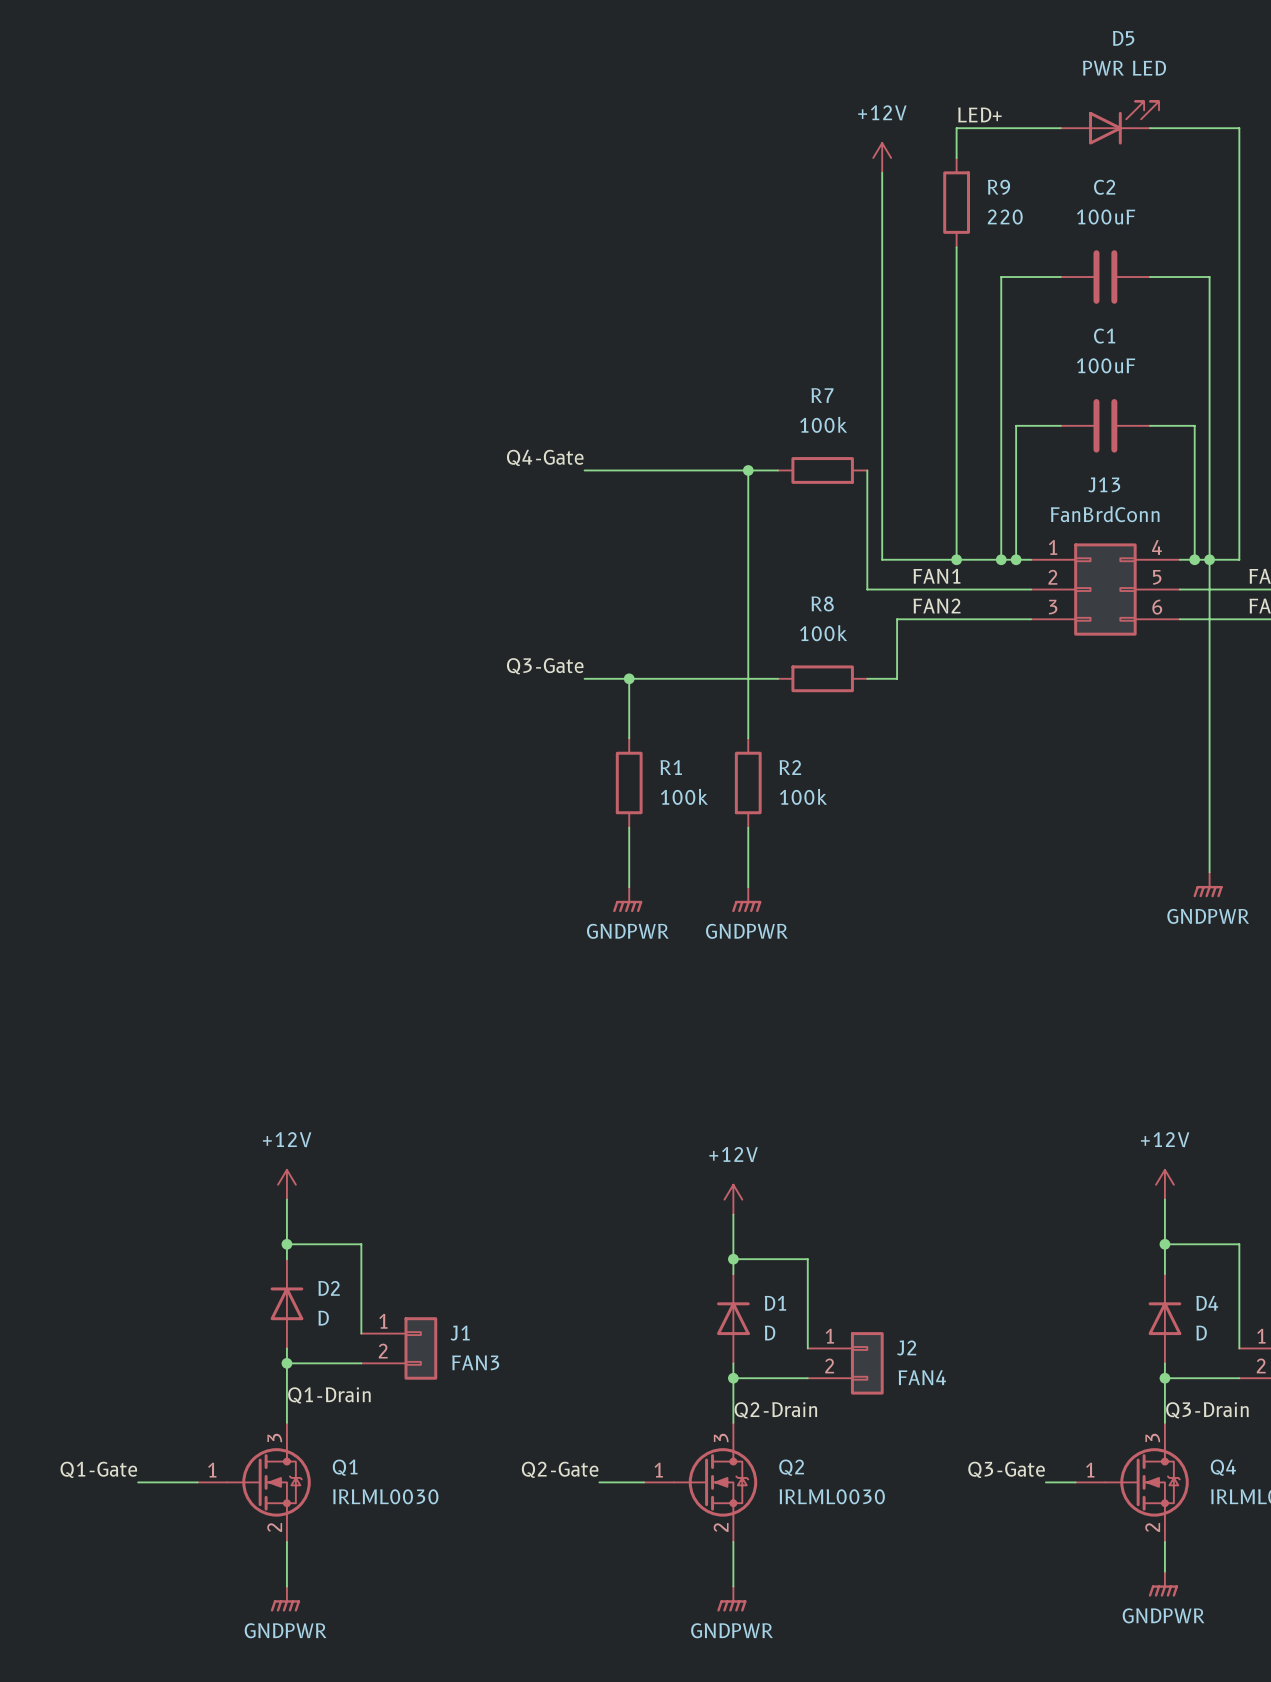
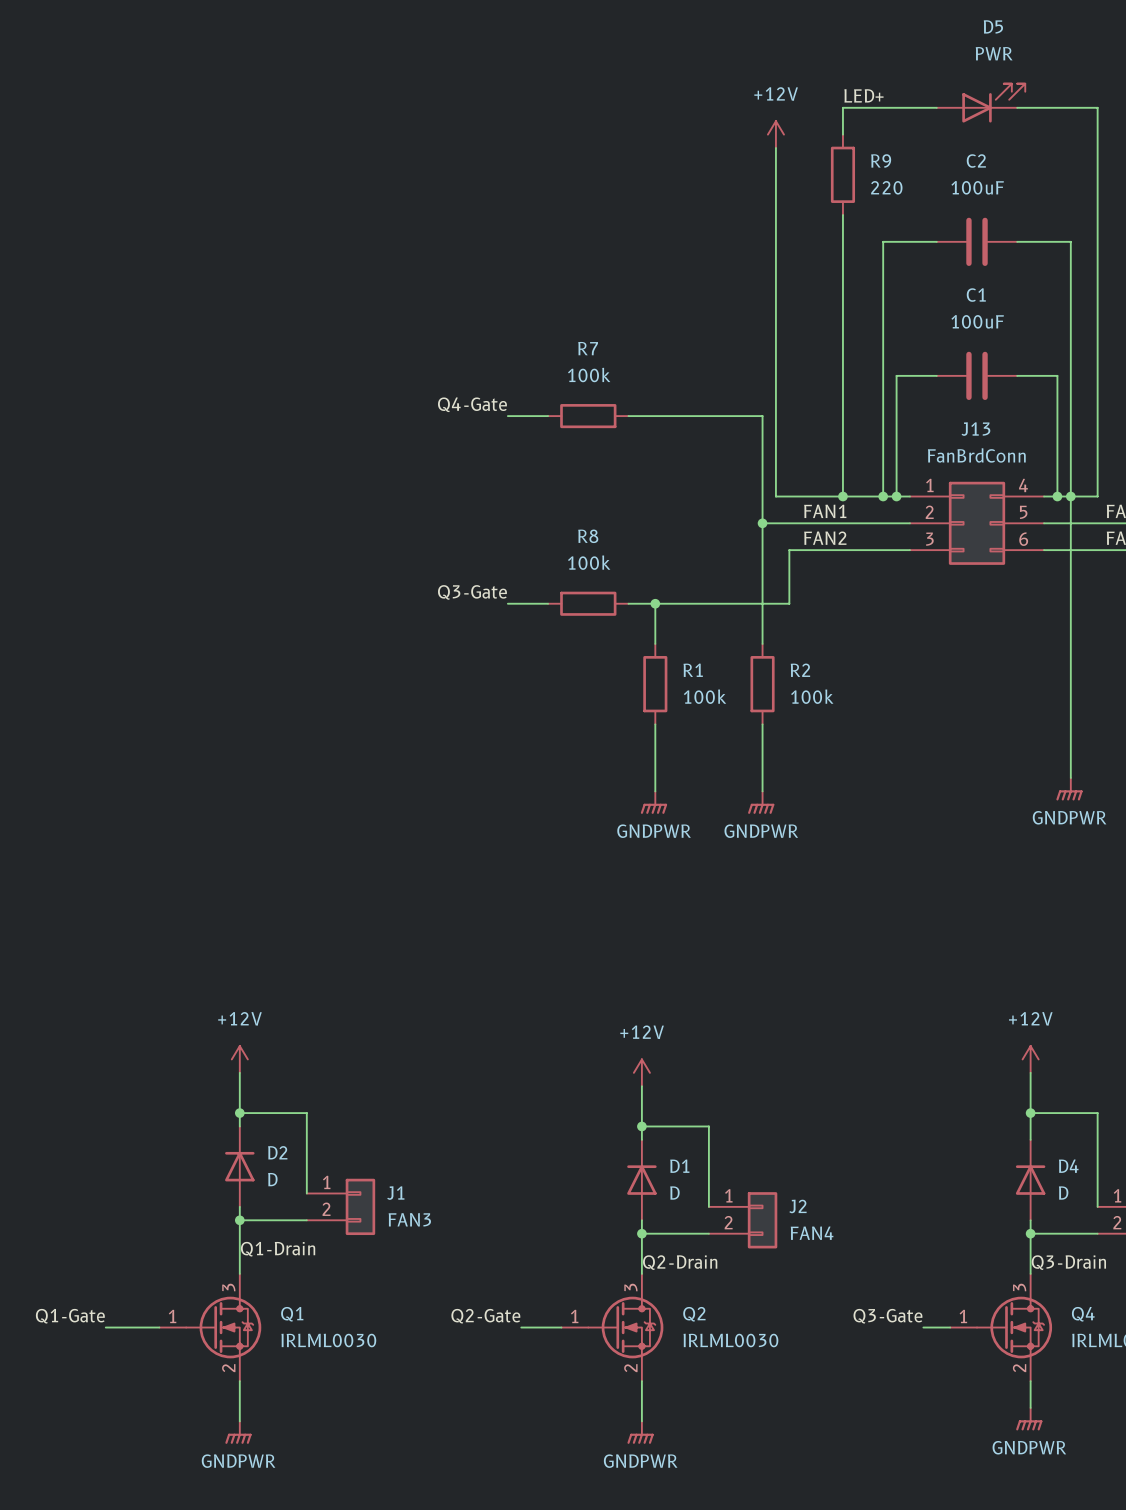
D5 value: PWR LED (1124, 68) -> PWR (994, 53)
wire: (629, 470) (718, 470) -> (682, 416) (762, 416)
wire: (748, 470) (748, 678) -> none
junction: (748, 470) -> none
R7 position: (822, 470) -> (588, 416)
wire: none -> (762, 523) (762, 643)
junction: none -> (762, 523)
junction: (629, 678) -> none
wire: (718, 678) (629, 678) (629, 738) -> none
junction: none -> (655, 603)
wire: none -> (682, 603) (762, 603)
R8 position: (822, 678) -> (588, 603)
R1 position: (629, 782) -> (655, 684)
R2 position: (748, 782) -> (762, 684)
wire: none -> (762, 724) (762, 791)
wire: (629, 827) (629, 887) -> none
power symbol position: GNDPWR (627, 899) -> GNDPWR (761, 802)

